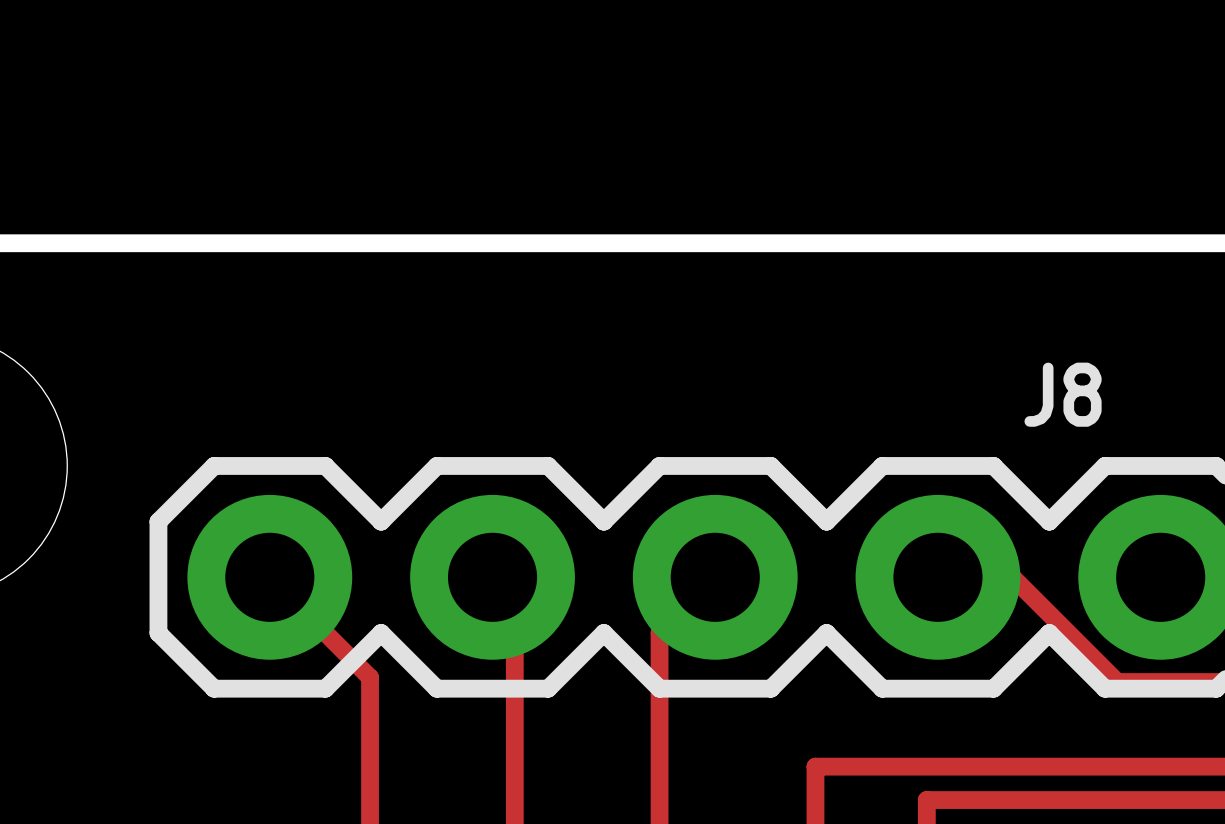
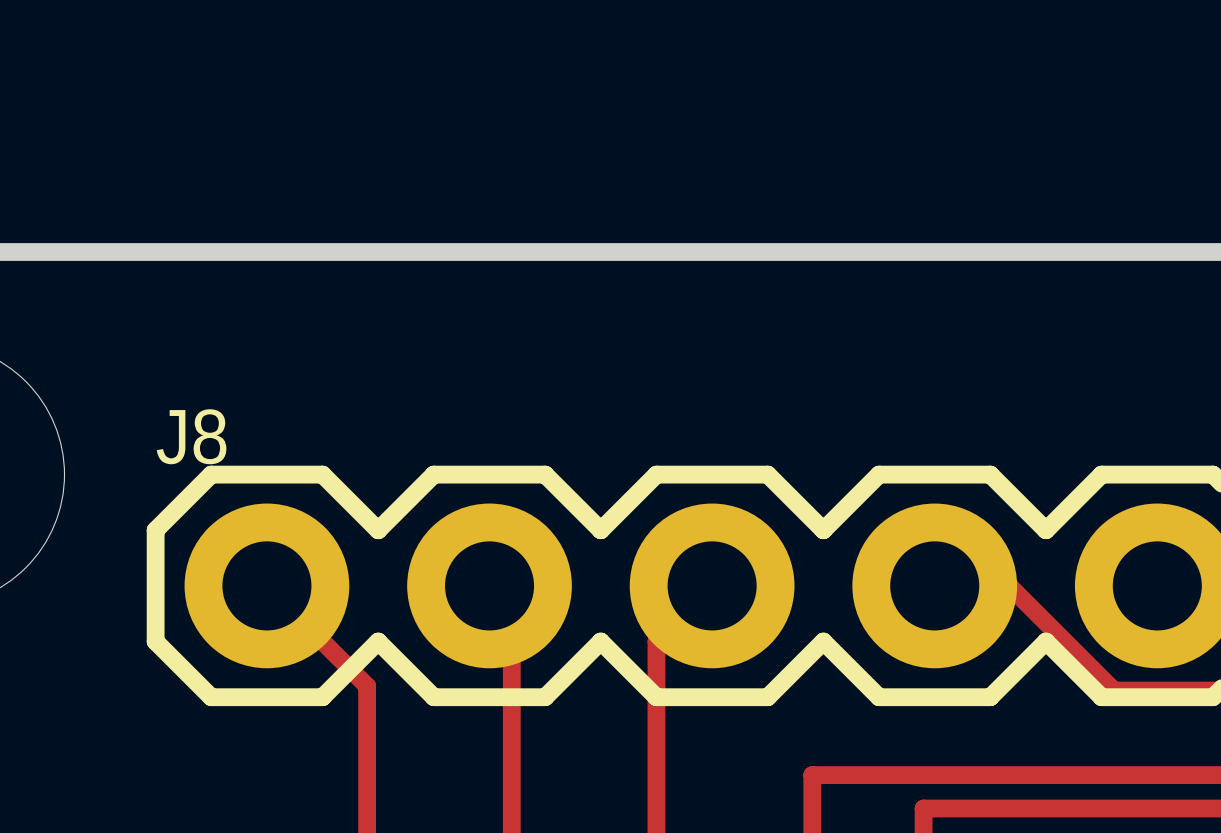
J8 name position: J8 (1063, 394) -> J8 (191, 436)

